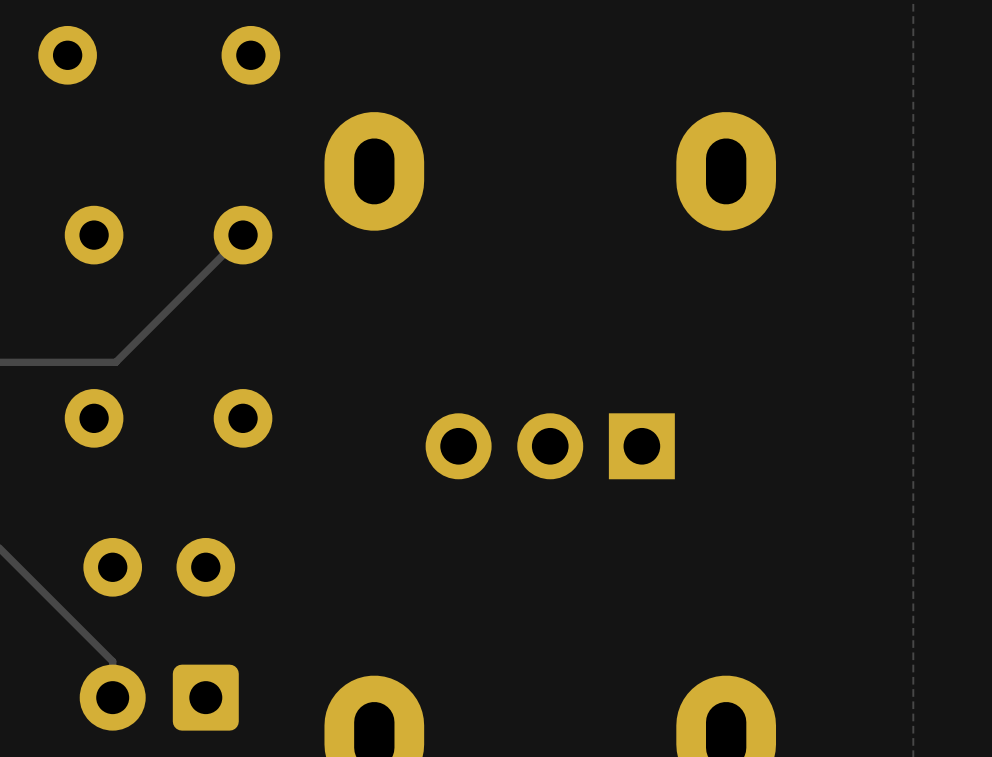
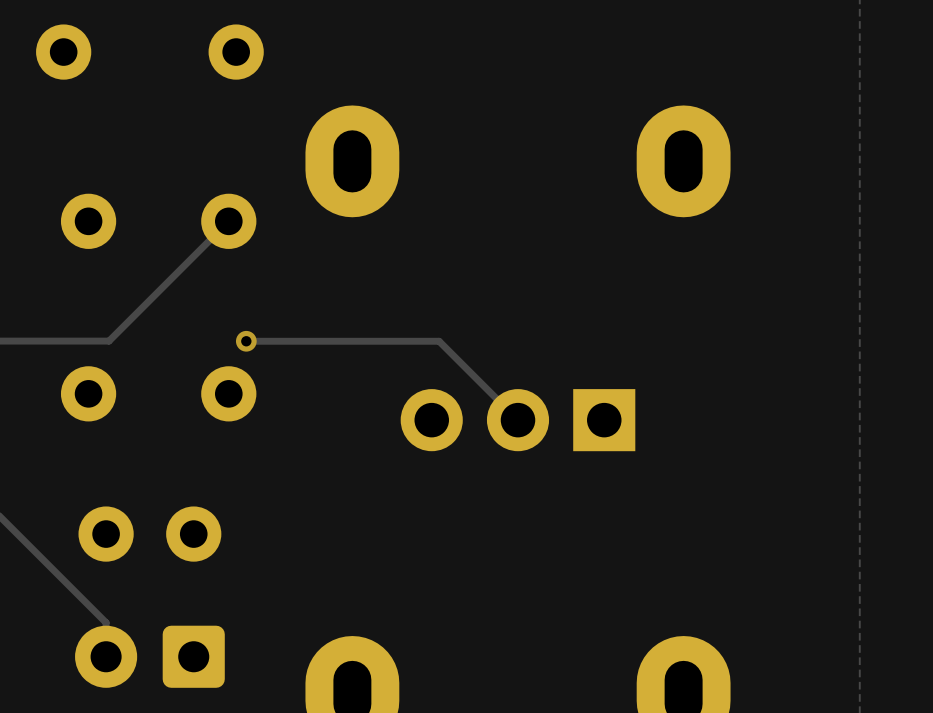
track: none -> (246, 341) (439, 341) (518, 420)
via: none -> (246, 341)

